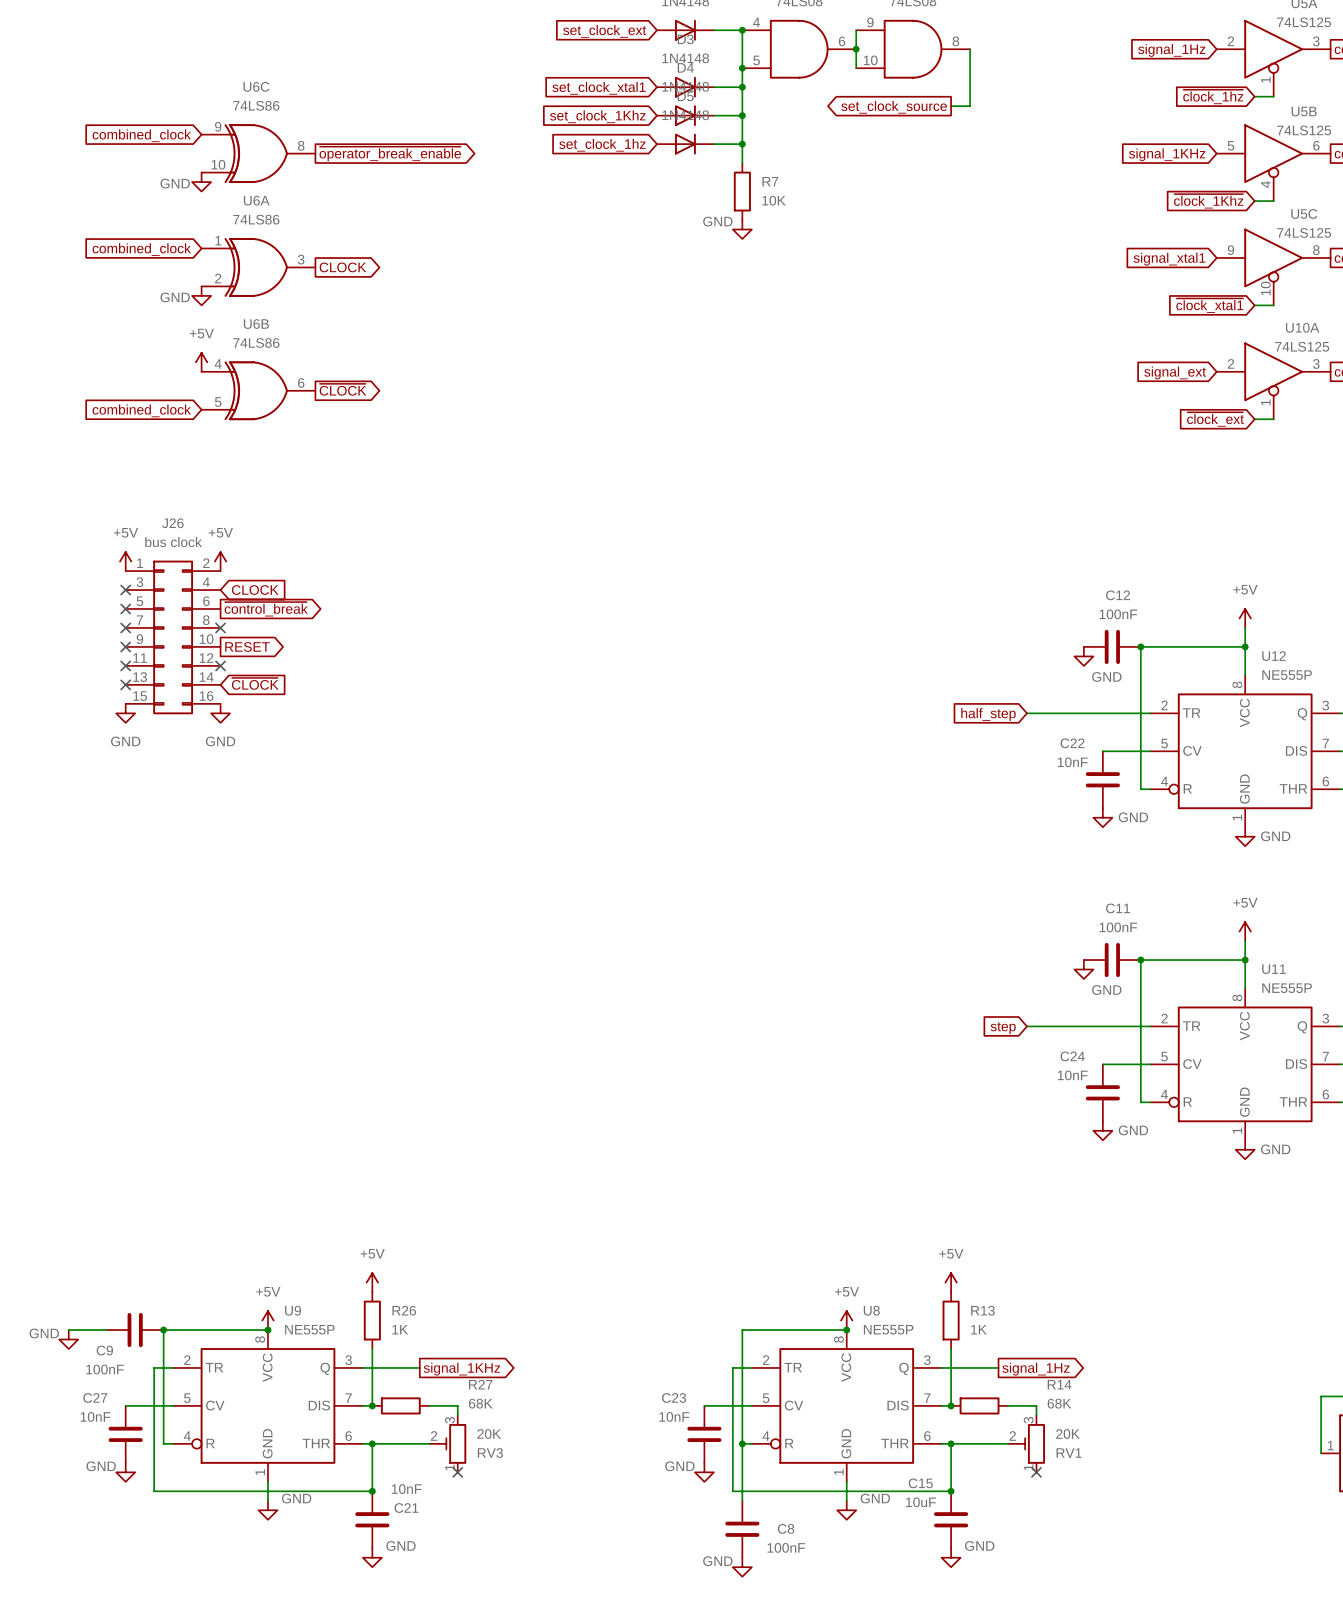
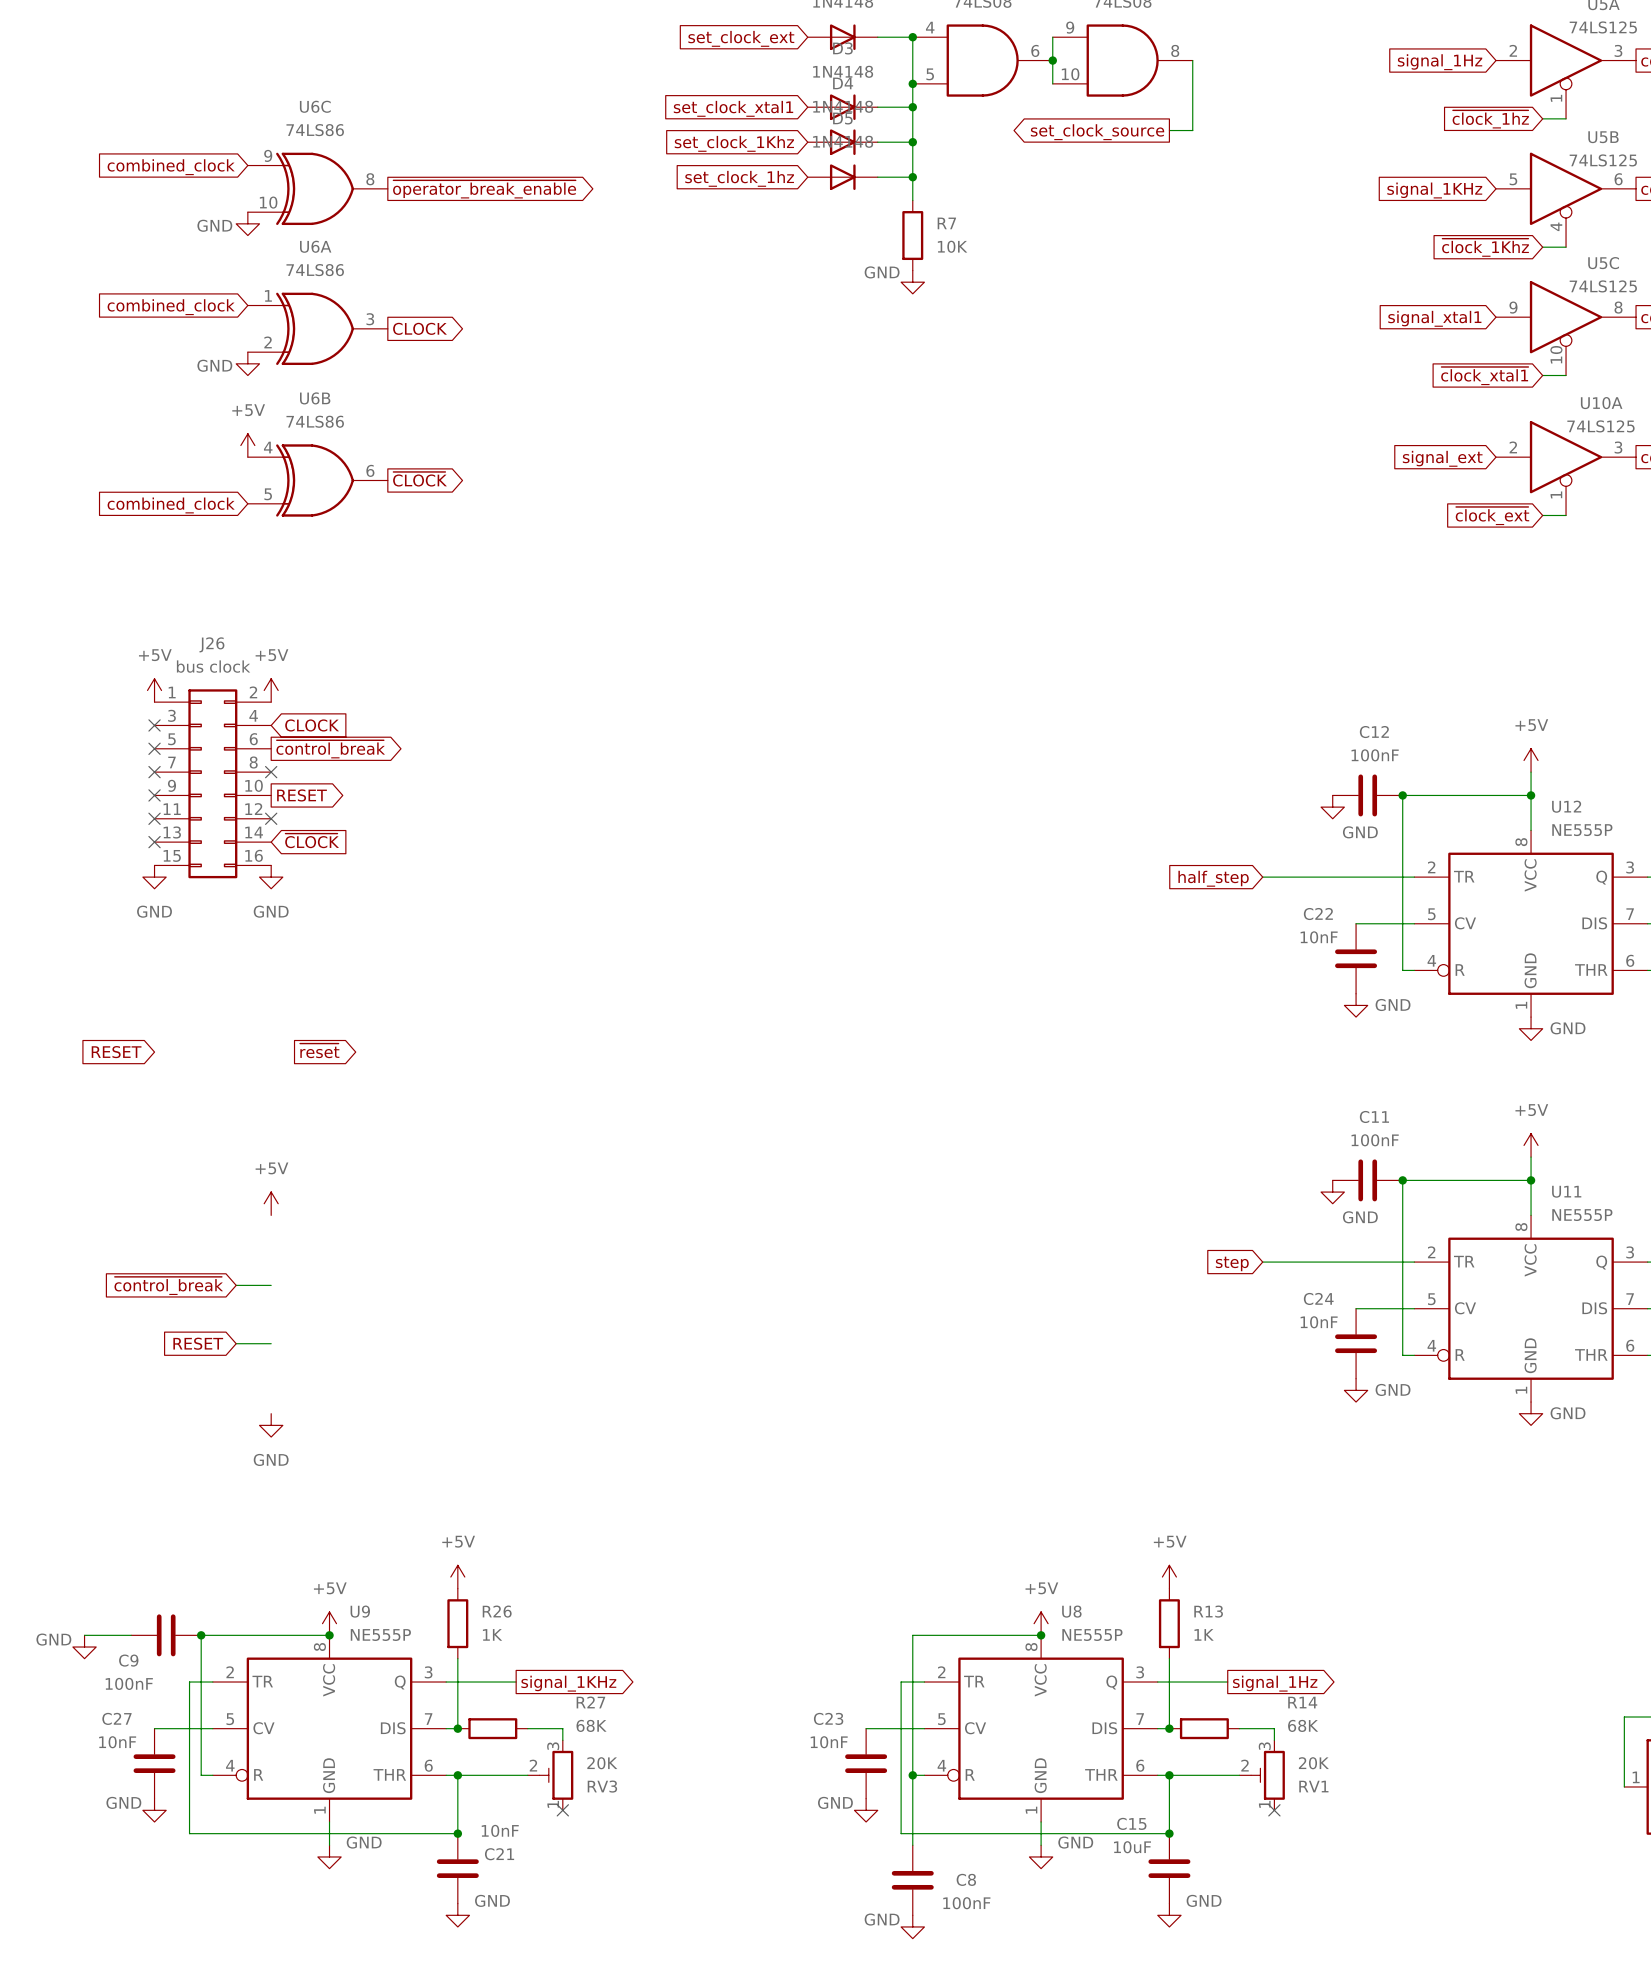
global label: none -> ~{reset} (319, 1050)
global label: none -> RESET (116, 1052)
power symbol: none -> +5V (271, 1203)
global label: none -> ~{control_break} (168, 1285)
wire: none -> (236, 1285) (271, 1285)
global label: none -> RESET (198, 1343)
wire: none -> (236, 1343) (271, 1343)
power symbol: none -> GND (271, 1425)

